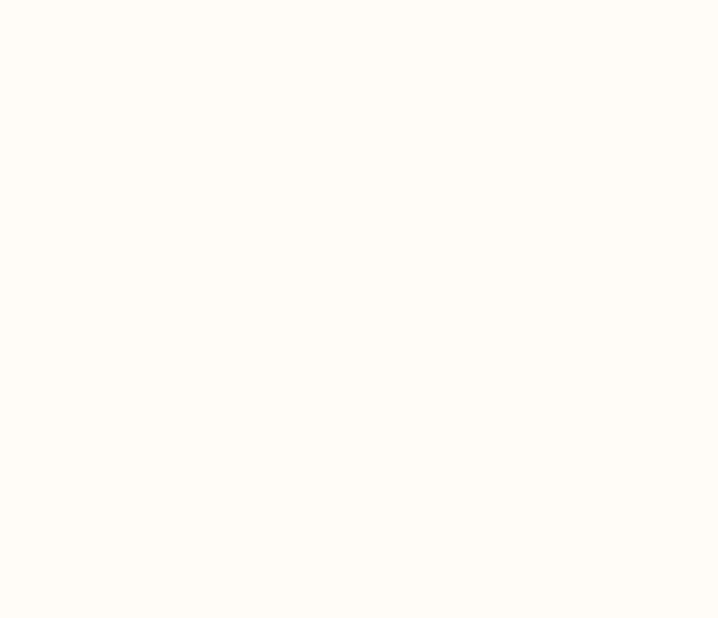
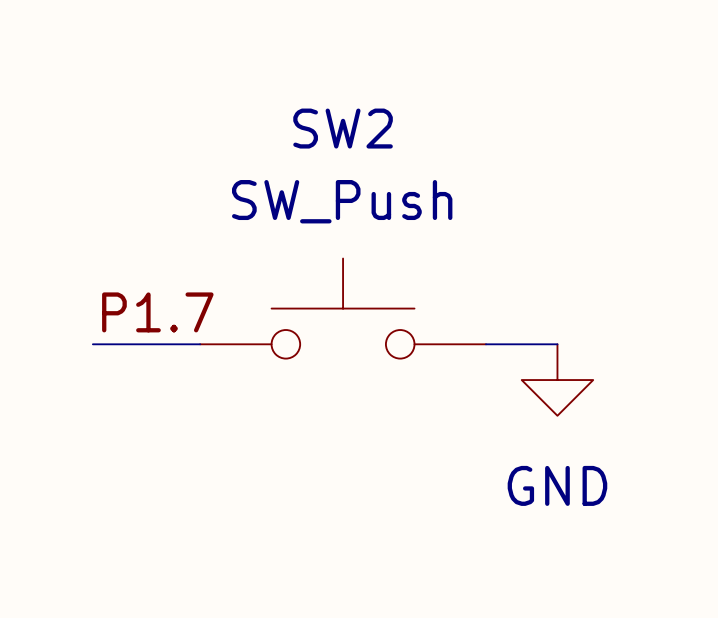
SW2: none -> SW_Push (343, 308)
label: none -> P1.7 (157, 312)
wire: none -> (92, 344) (200, 344)
wire: none -> (485, 344) (557, 344)
power symbol: none -> GND (557, 380)

